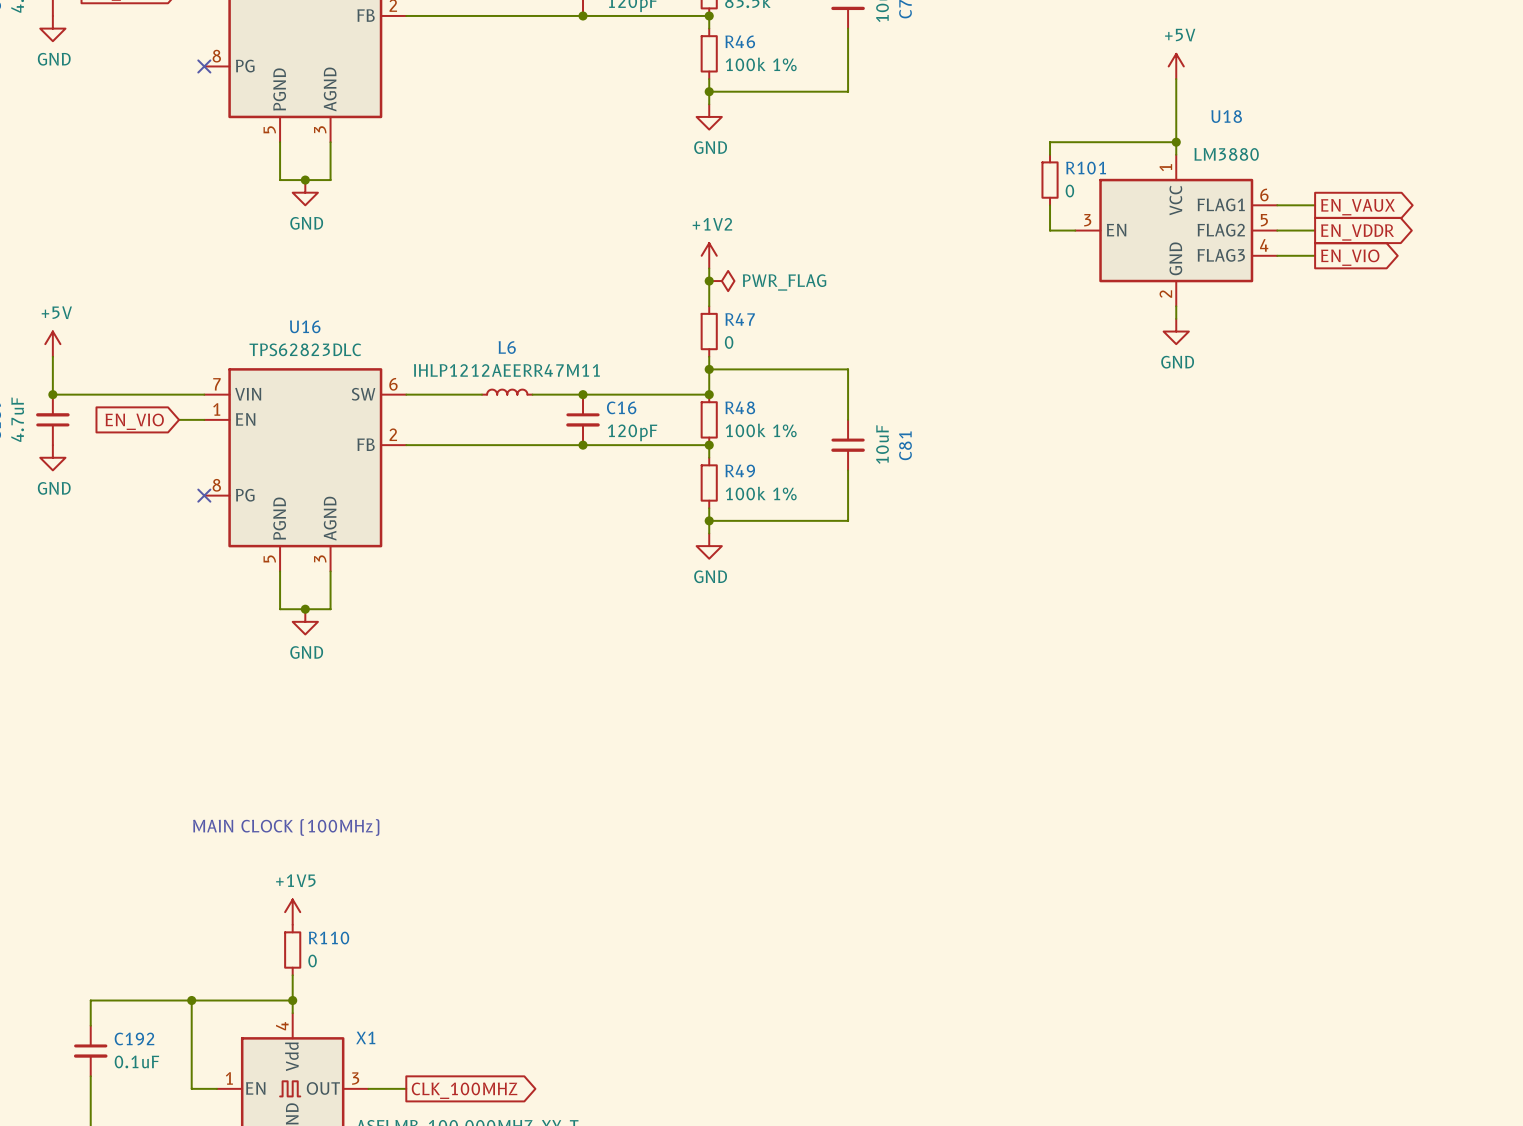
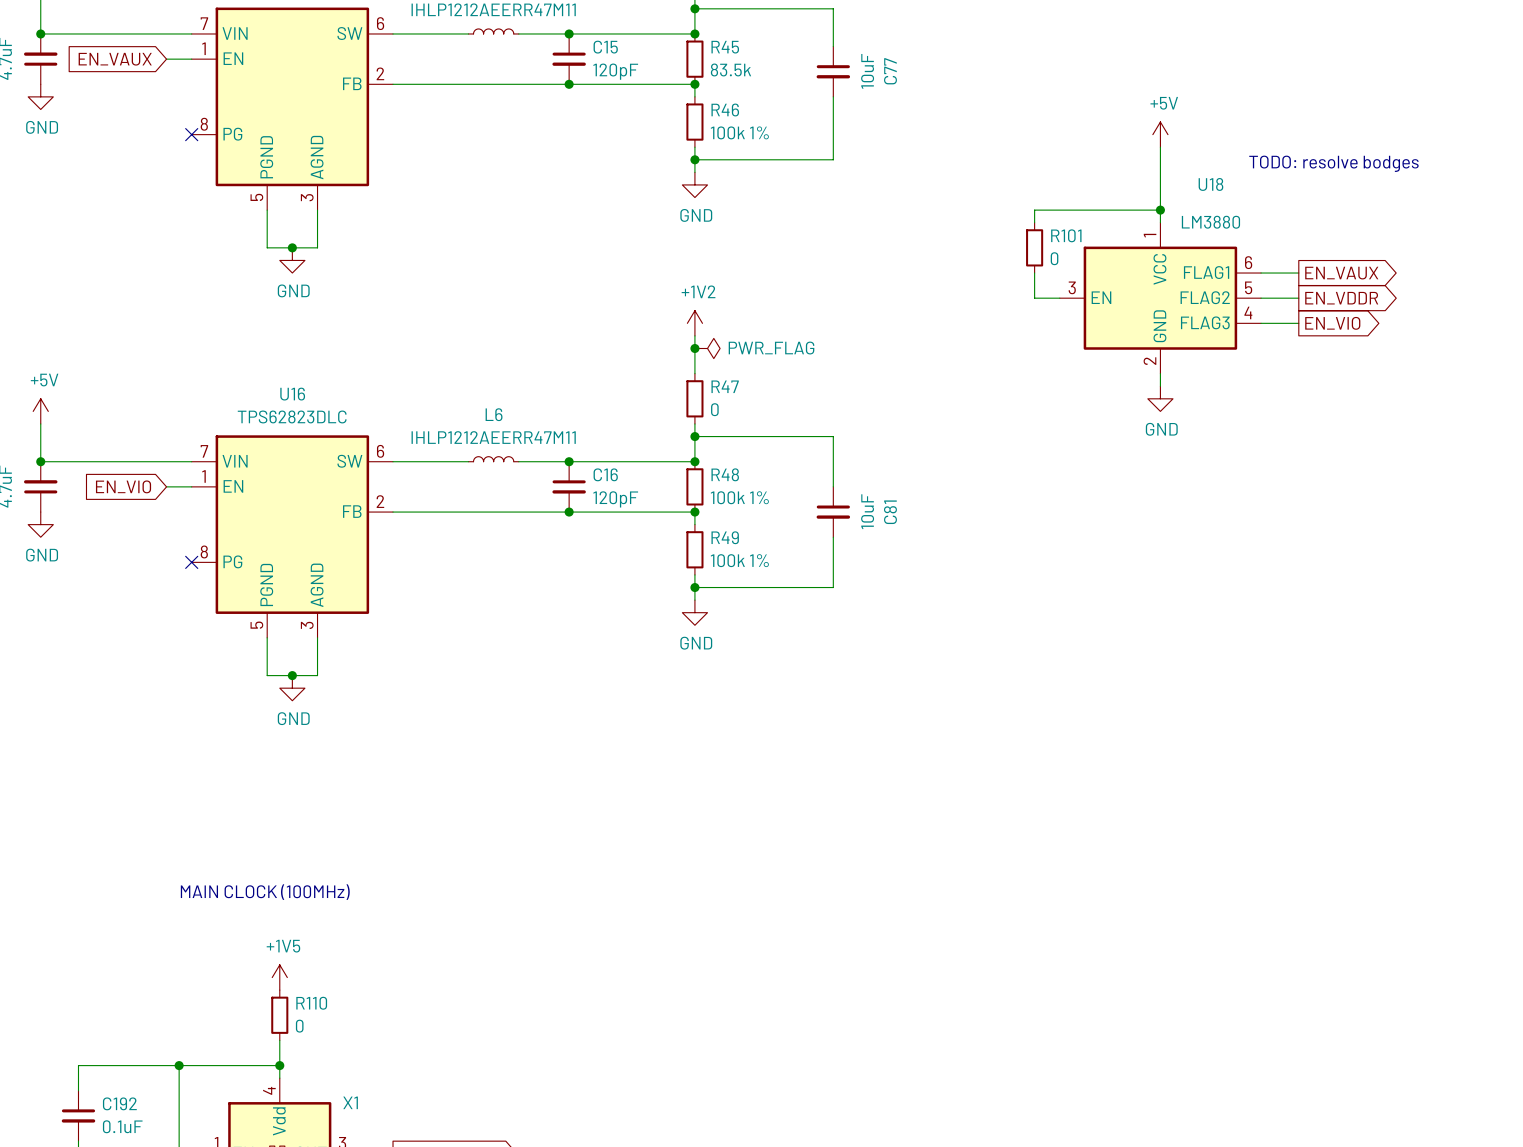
text: none -> TODO: resolve bodges (1333, 163)

